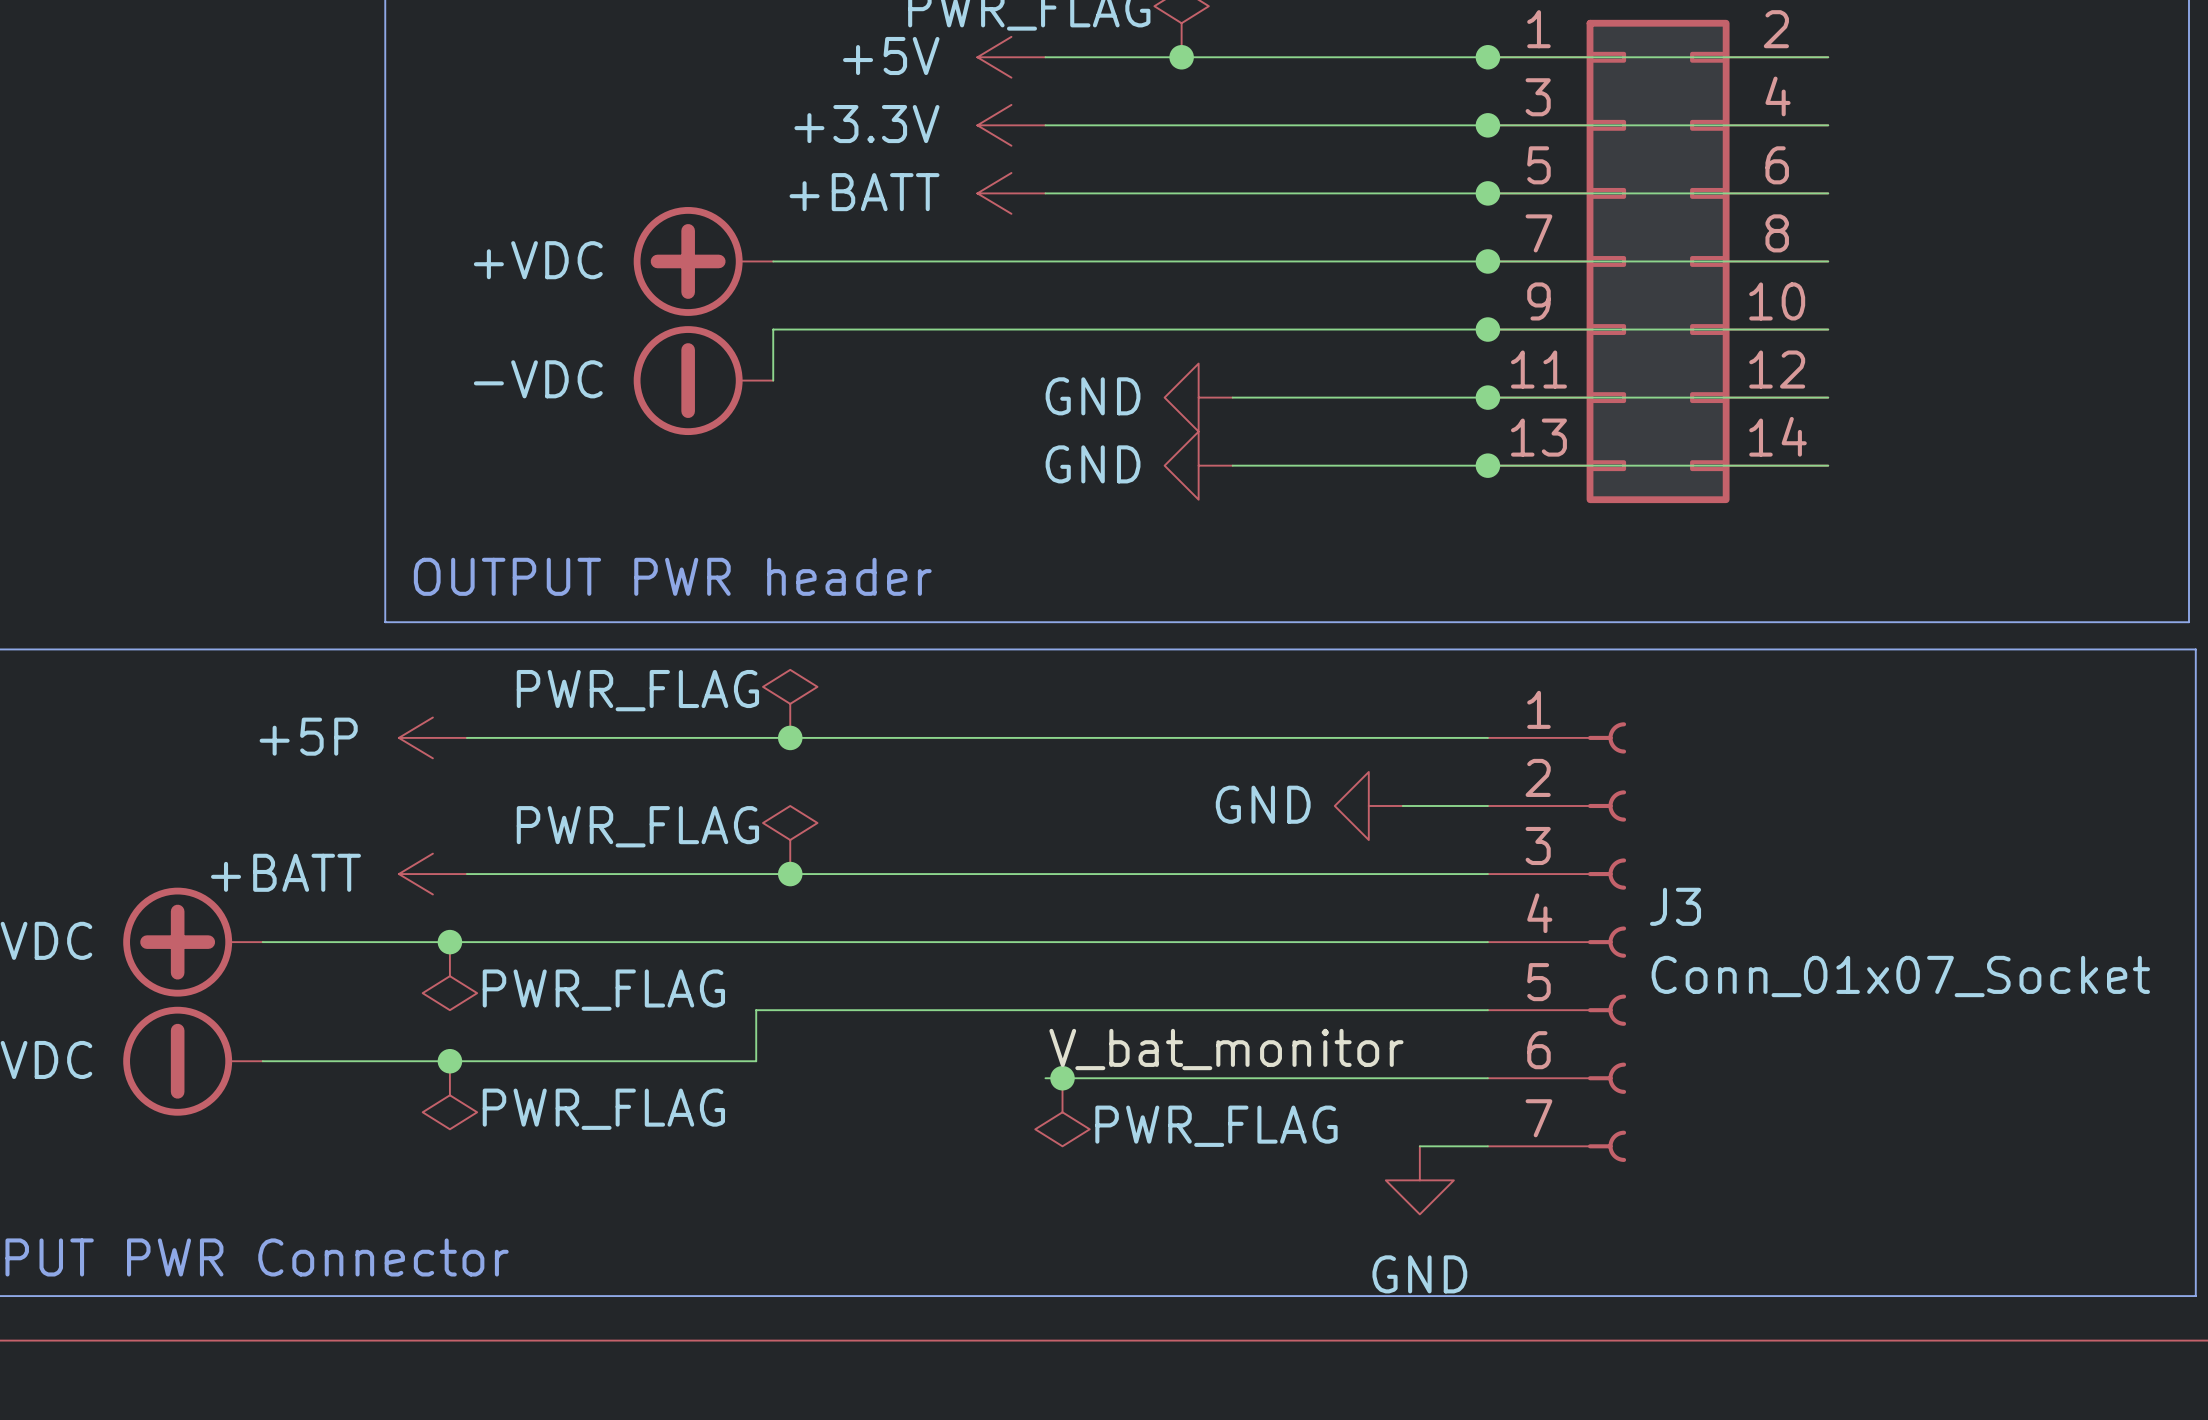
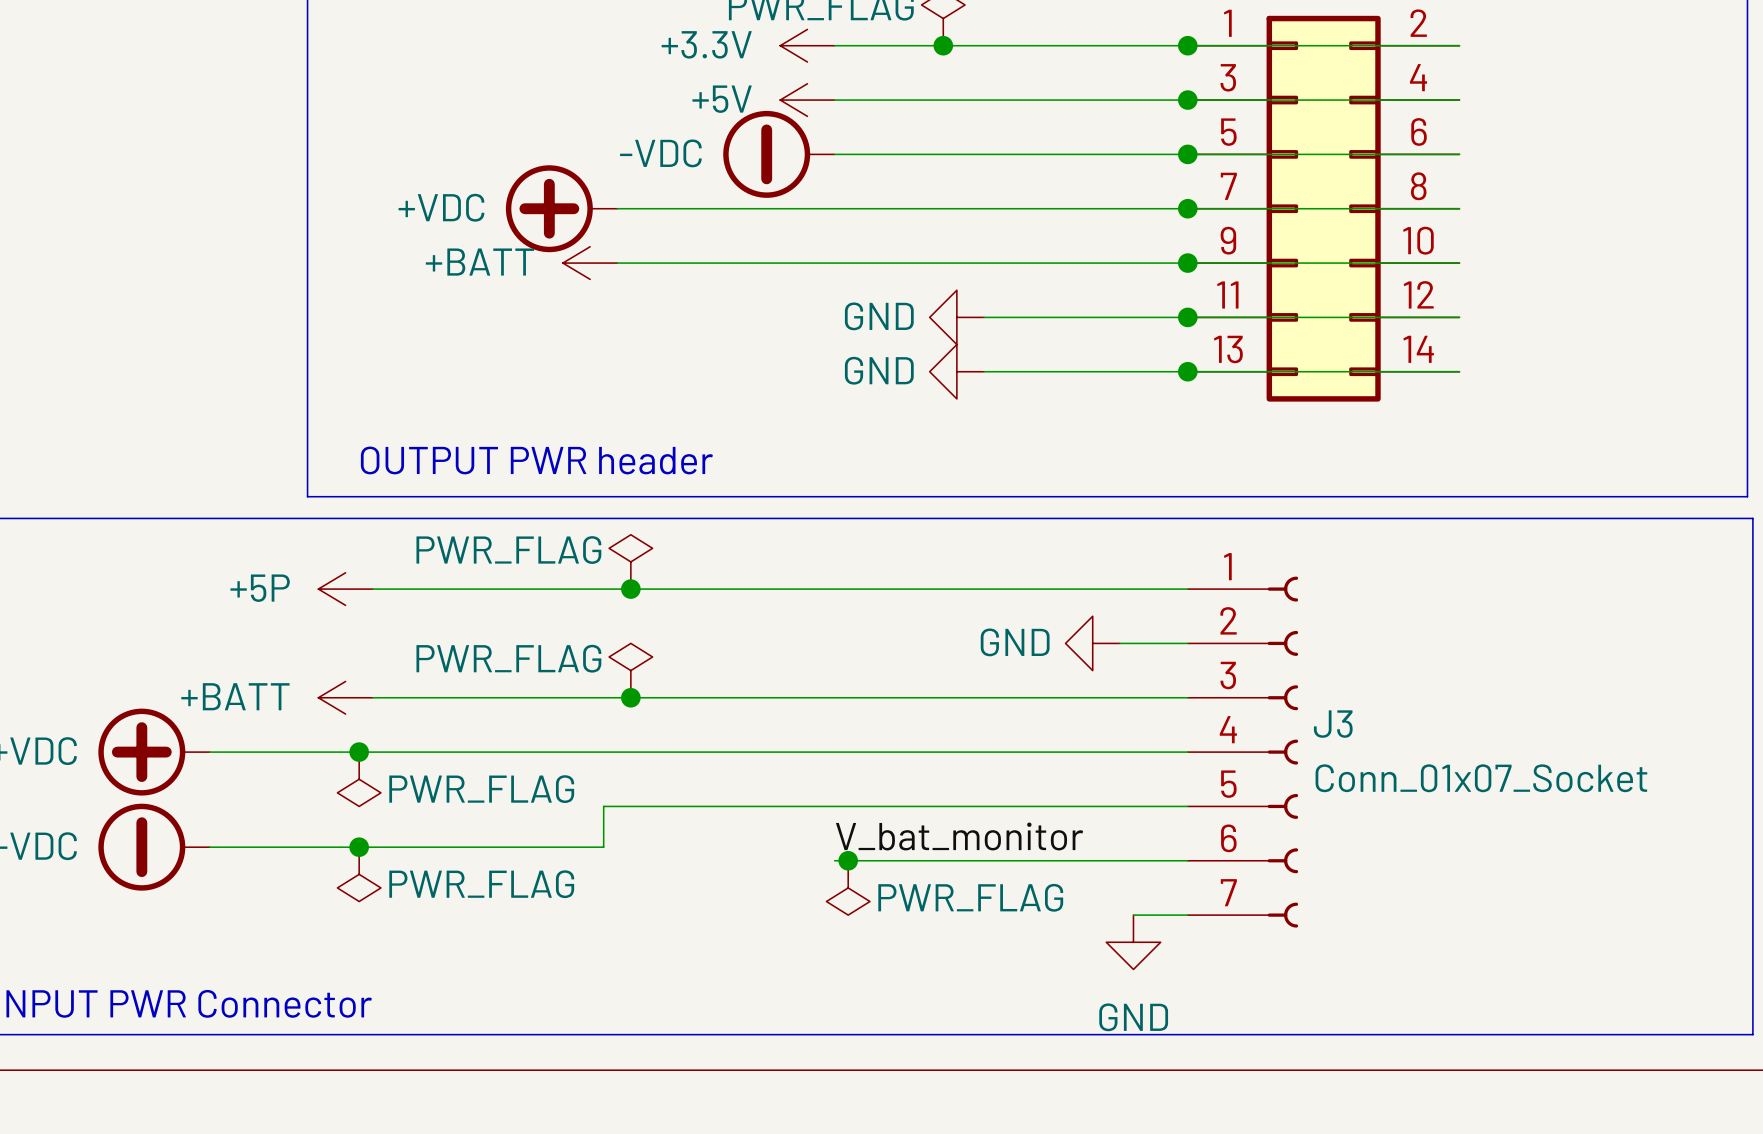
power symbol: +5V (1011, 57) -> +3.3V (807, 45)
power symbol: +3.3V (1011, 125) -> +5V (807, 100)
power symbol position: +BATT (1011, 193) -> +BATT (590, 263)
wire: (773, 329) (773, 380) -> none
power symbol position: -VDC (703, 380) -> -VDC (778, 154)

